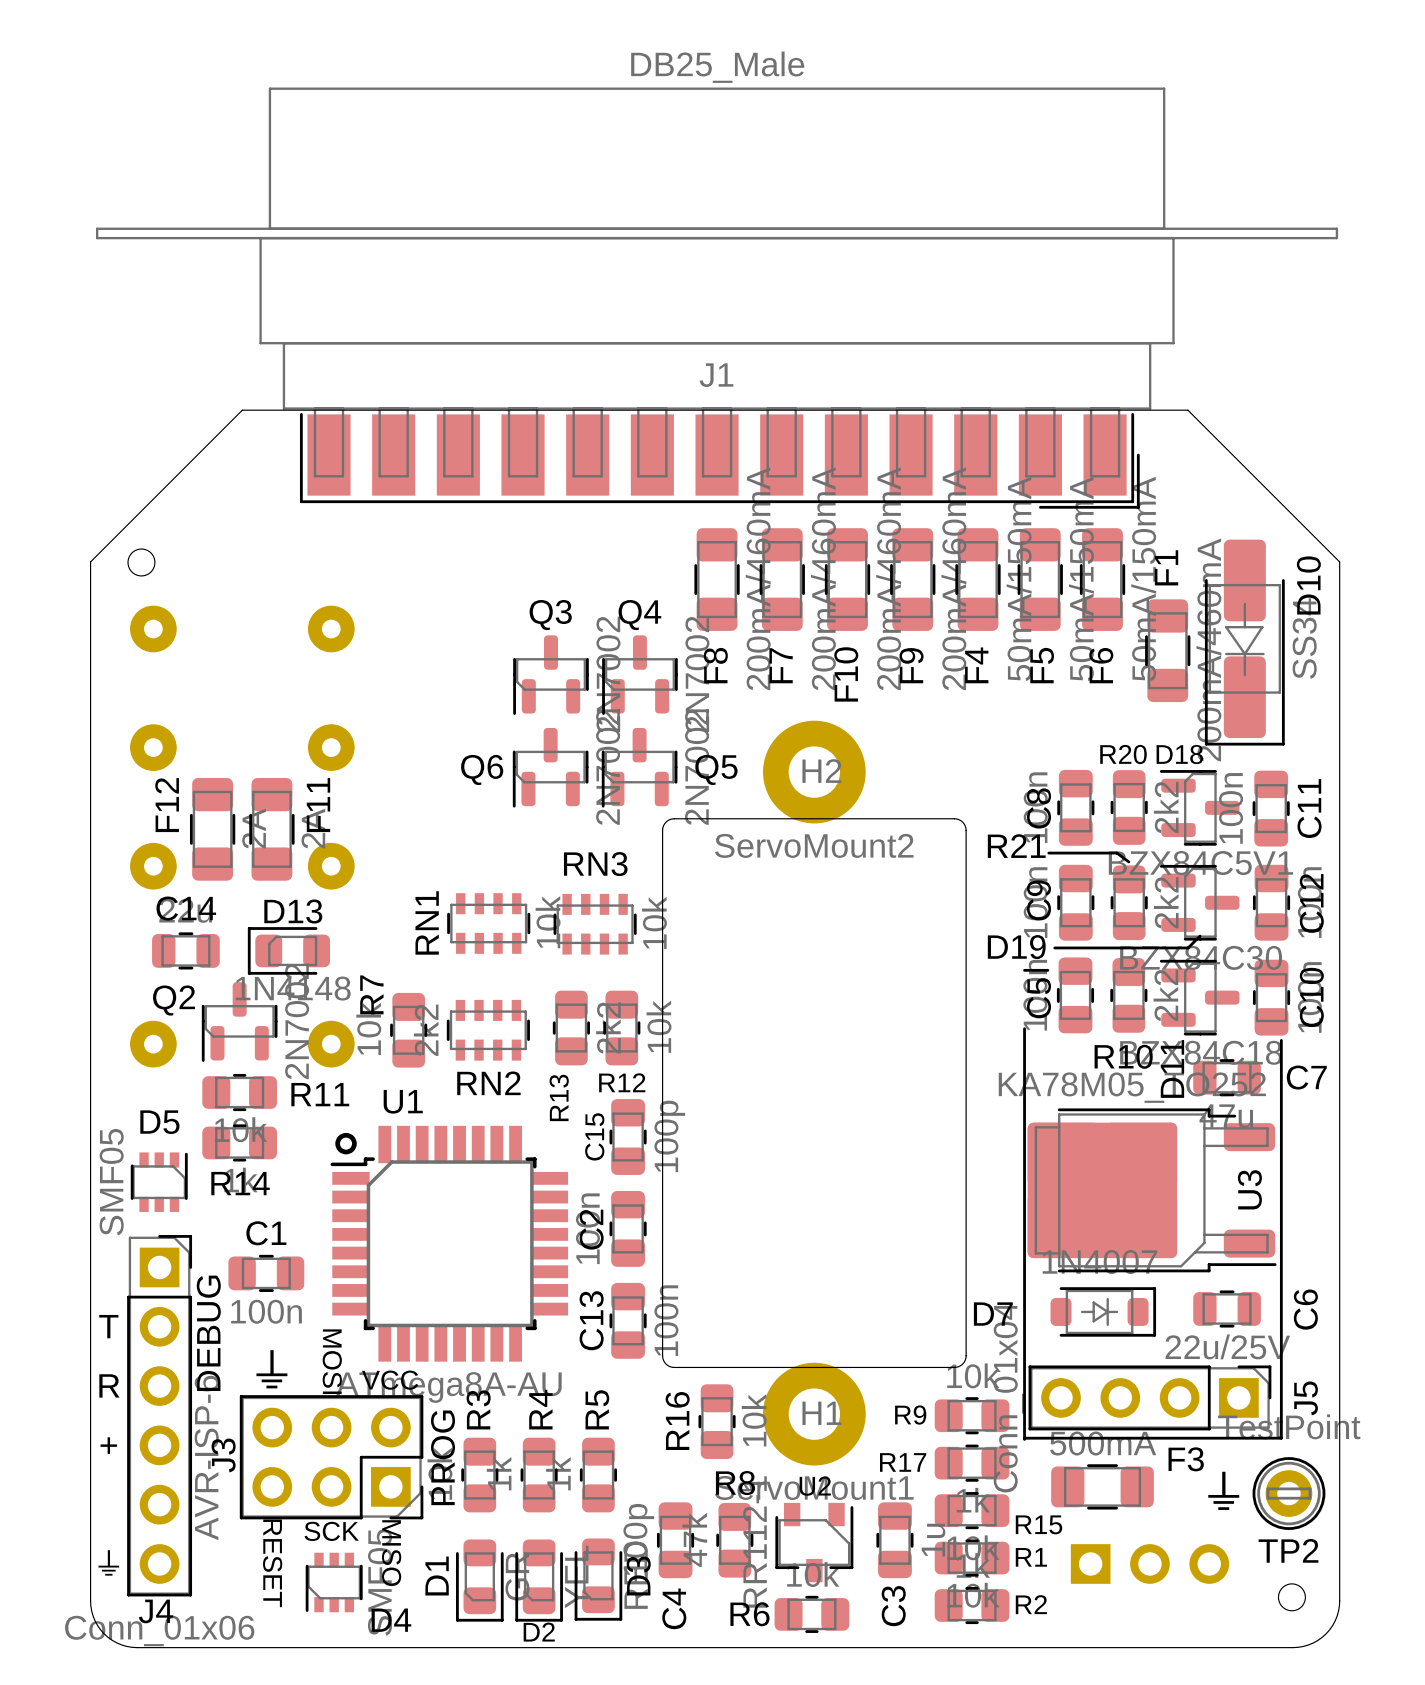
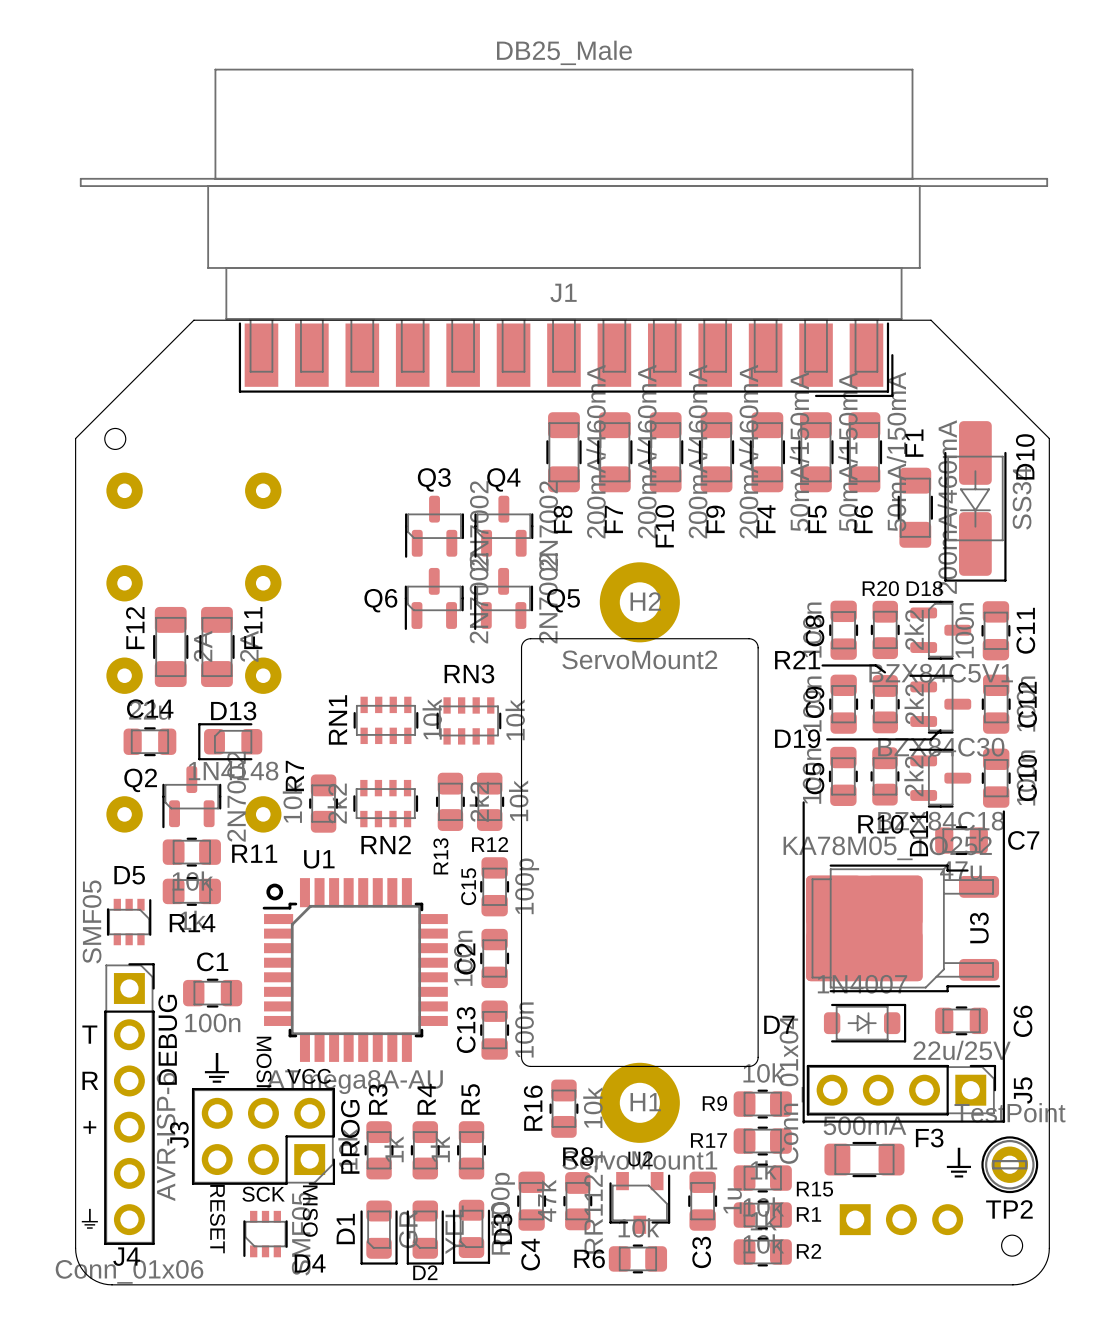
line: (1024, 970) (1047, 970) -> none

